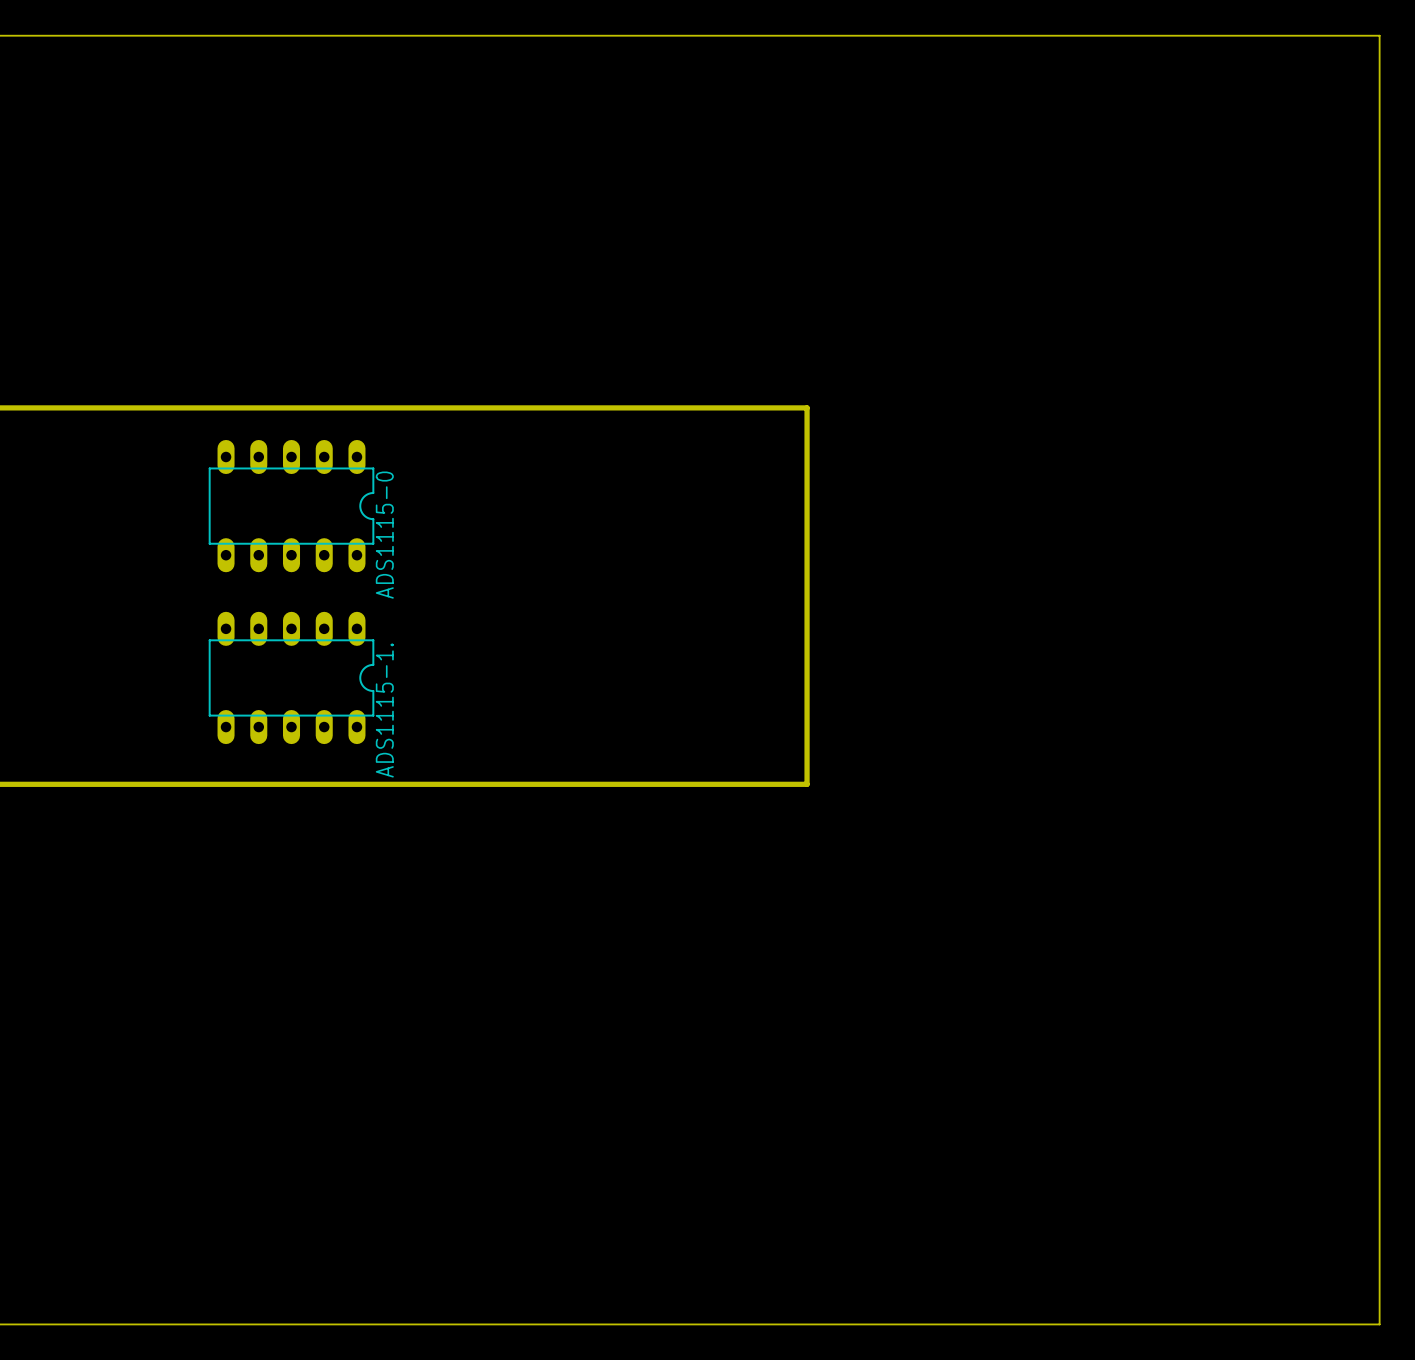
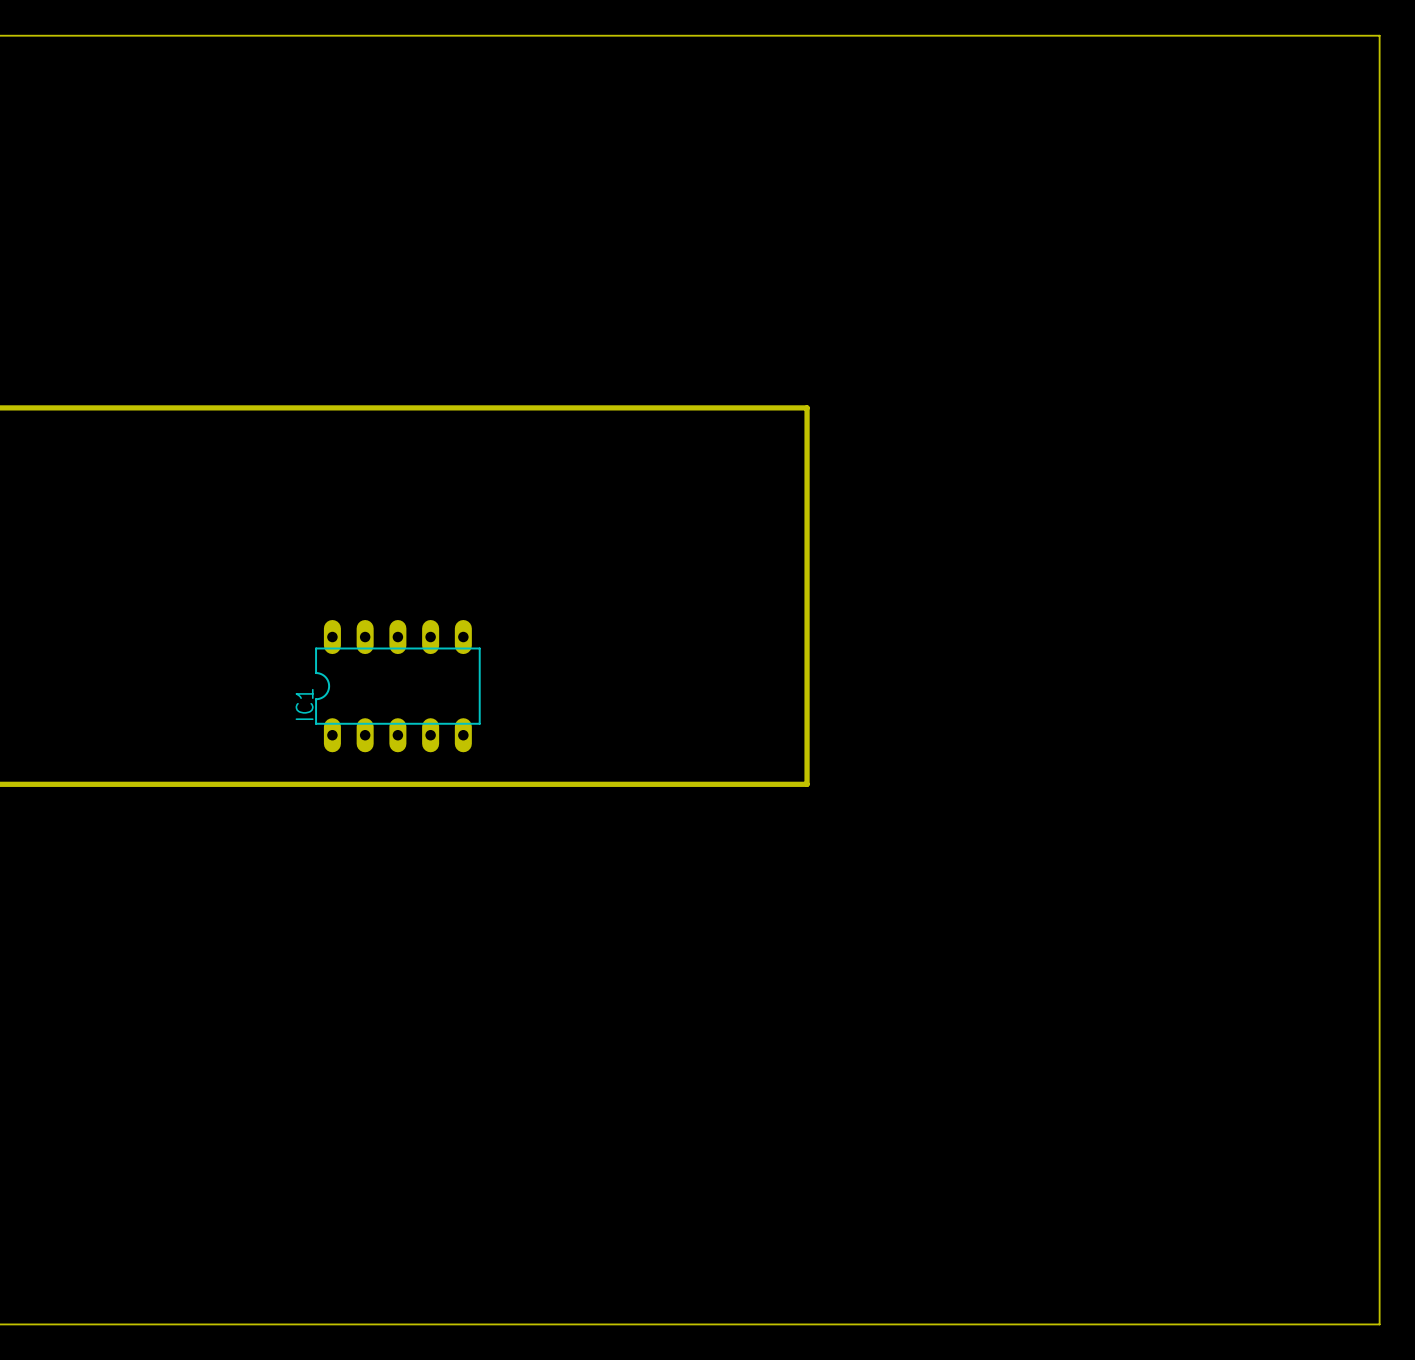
ADS1115-0: (291, 506) -> none
ADS1115-1.: (291, 677) -> none
IC1: none -> (397, 686)

